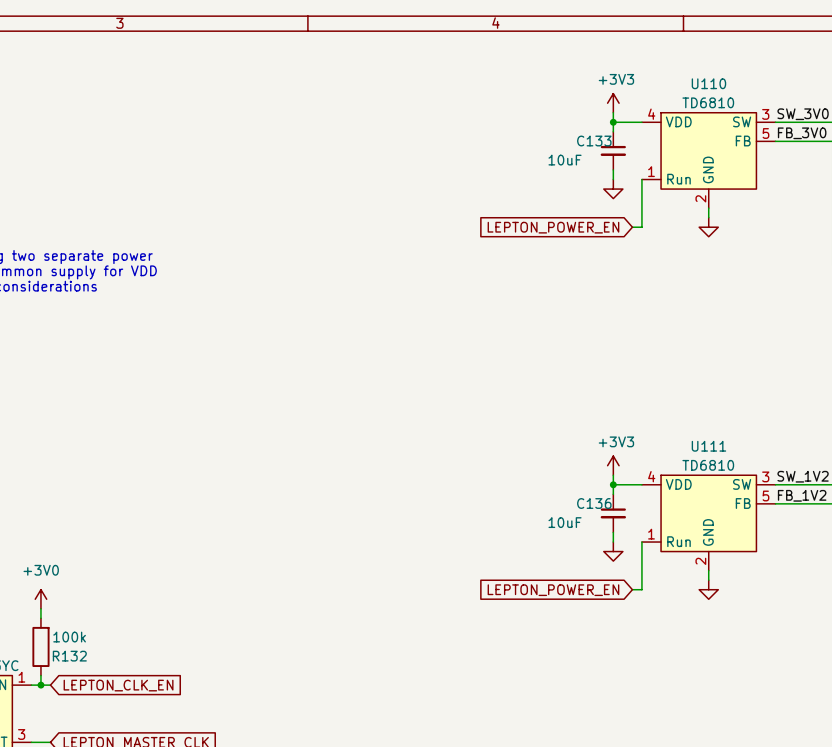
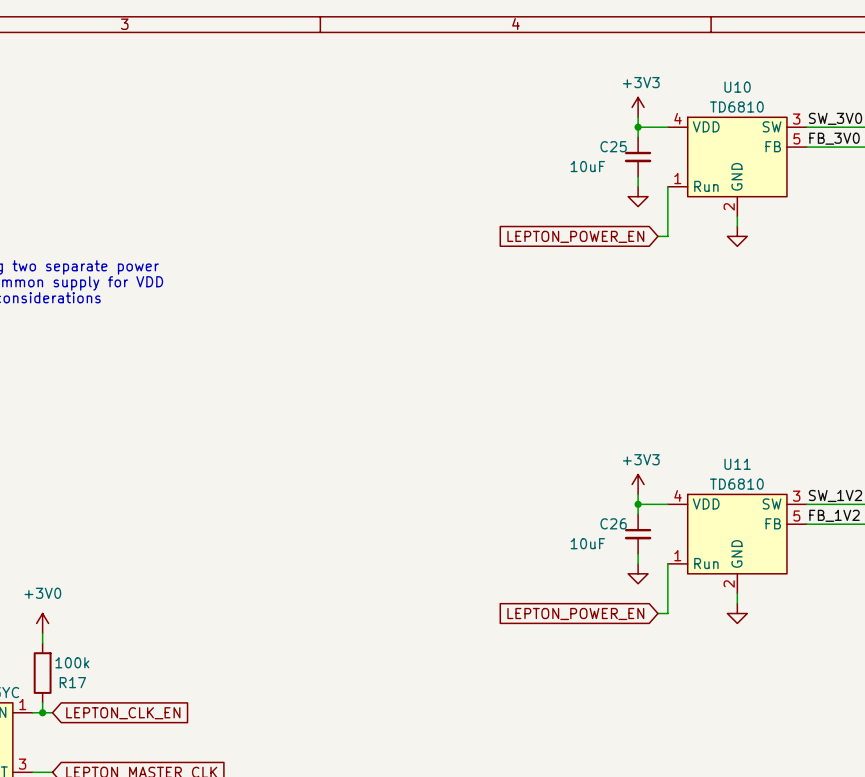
U110 name: U110 (708, 83) -> U10 (737, 87)
C133 name: C133 (594, 141) -> C25 (613, 146)
U111 name: U111 (708, 446) -> U11 (737, 464)
C136 name: C136 (594, 503) -> C26 (613, 523)
R132 name: R132 (69, 656) -> R17 (72, 682)

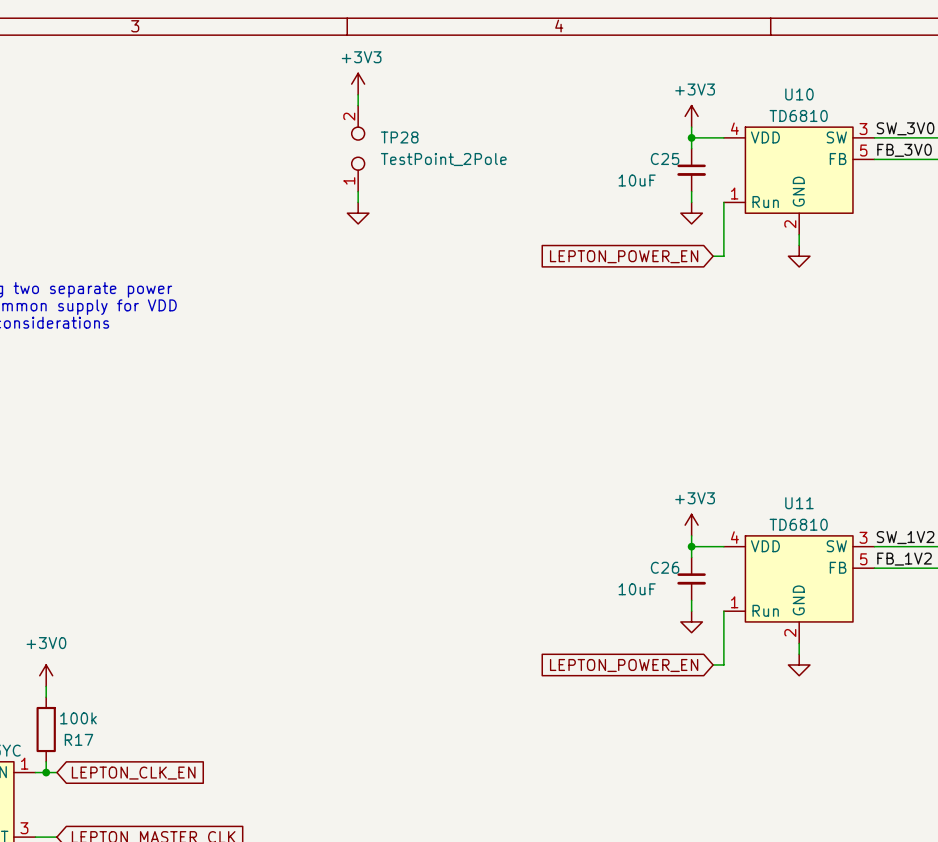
power symbol: none -> +3V3 (358, 84)
wire: none -> (358, 94) (358, 105)
TP28: none -> TestPoint_2Pole (358, 148)
wire: none -> (358, 191) (358, 202)
power symbol: none -> (358, 213)

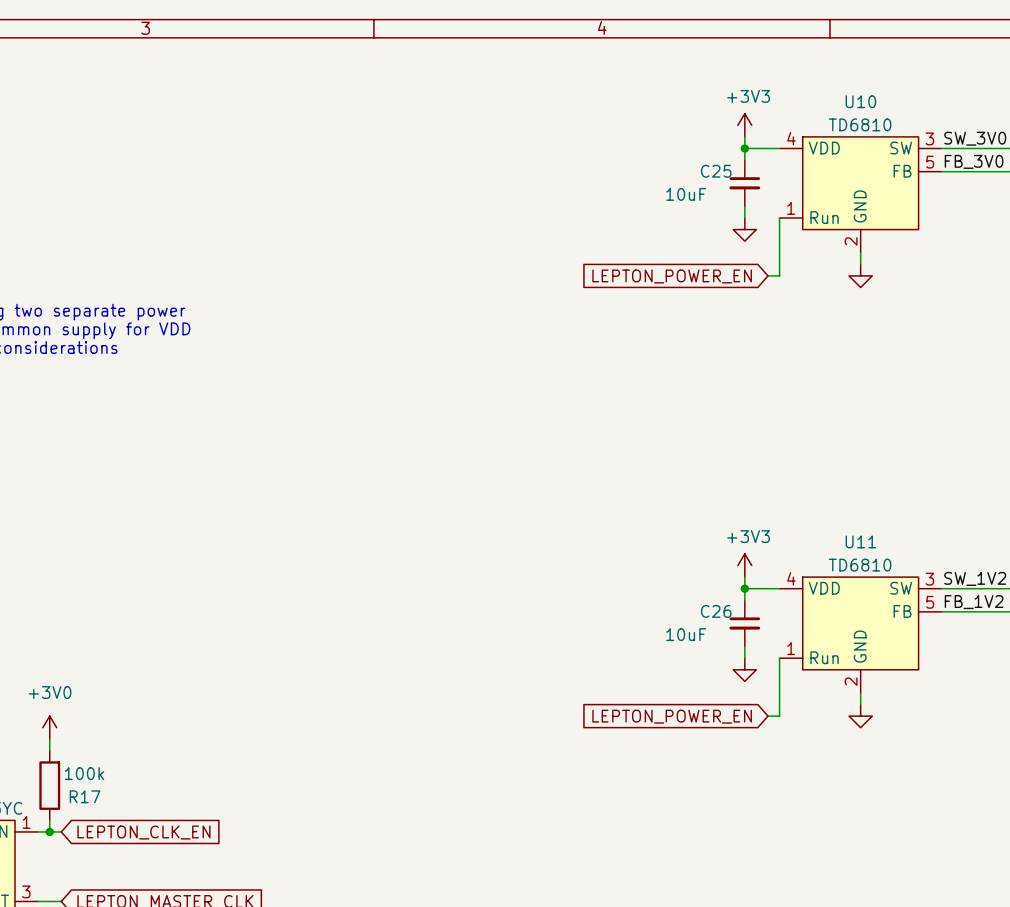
power symbol: +3V3 (358, 84) -> none
wire: (358, 94) (358, 105) -> none
TP28: TestPoint_2Pole (358, 148) -> none
wire: (358, 191) (358, 202) -> none
power symbol: (358, 213) -> none

